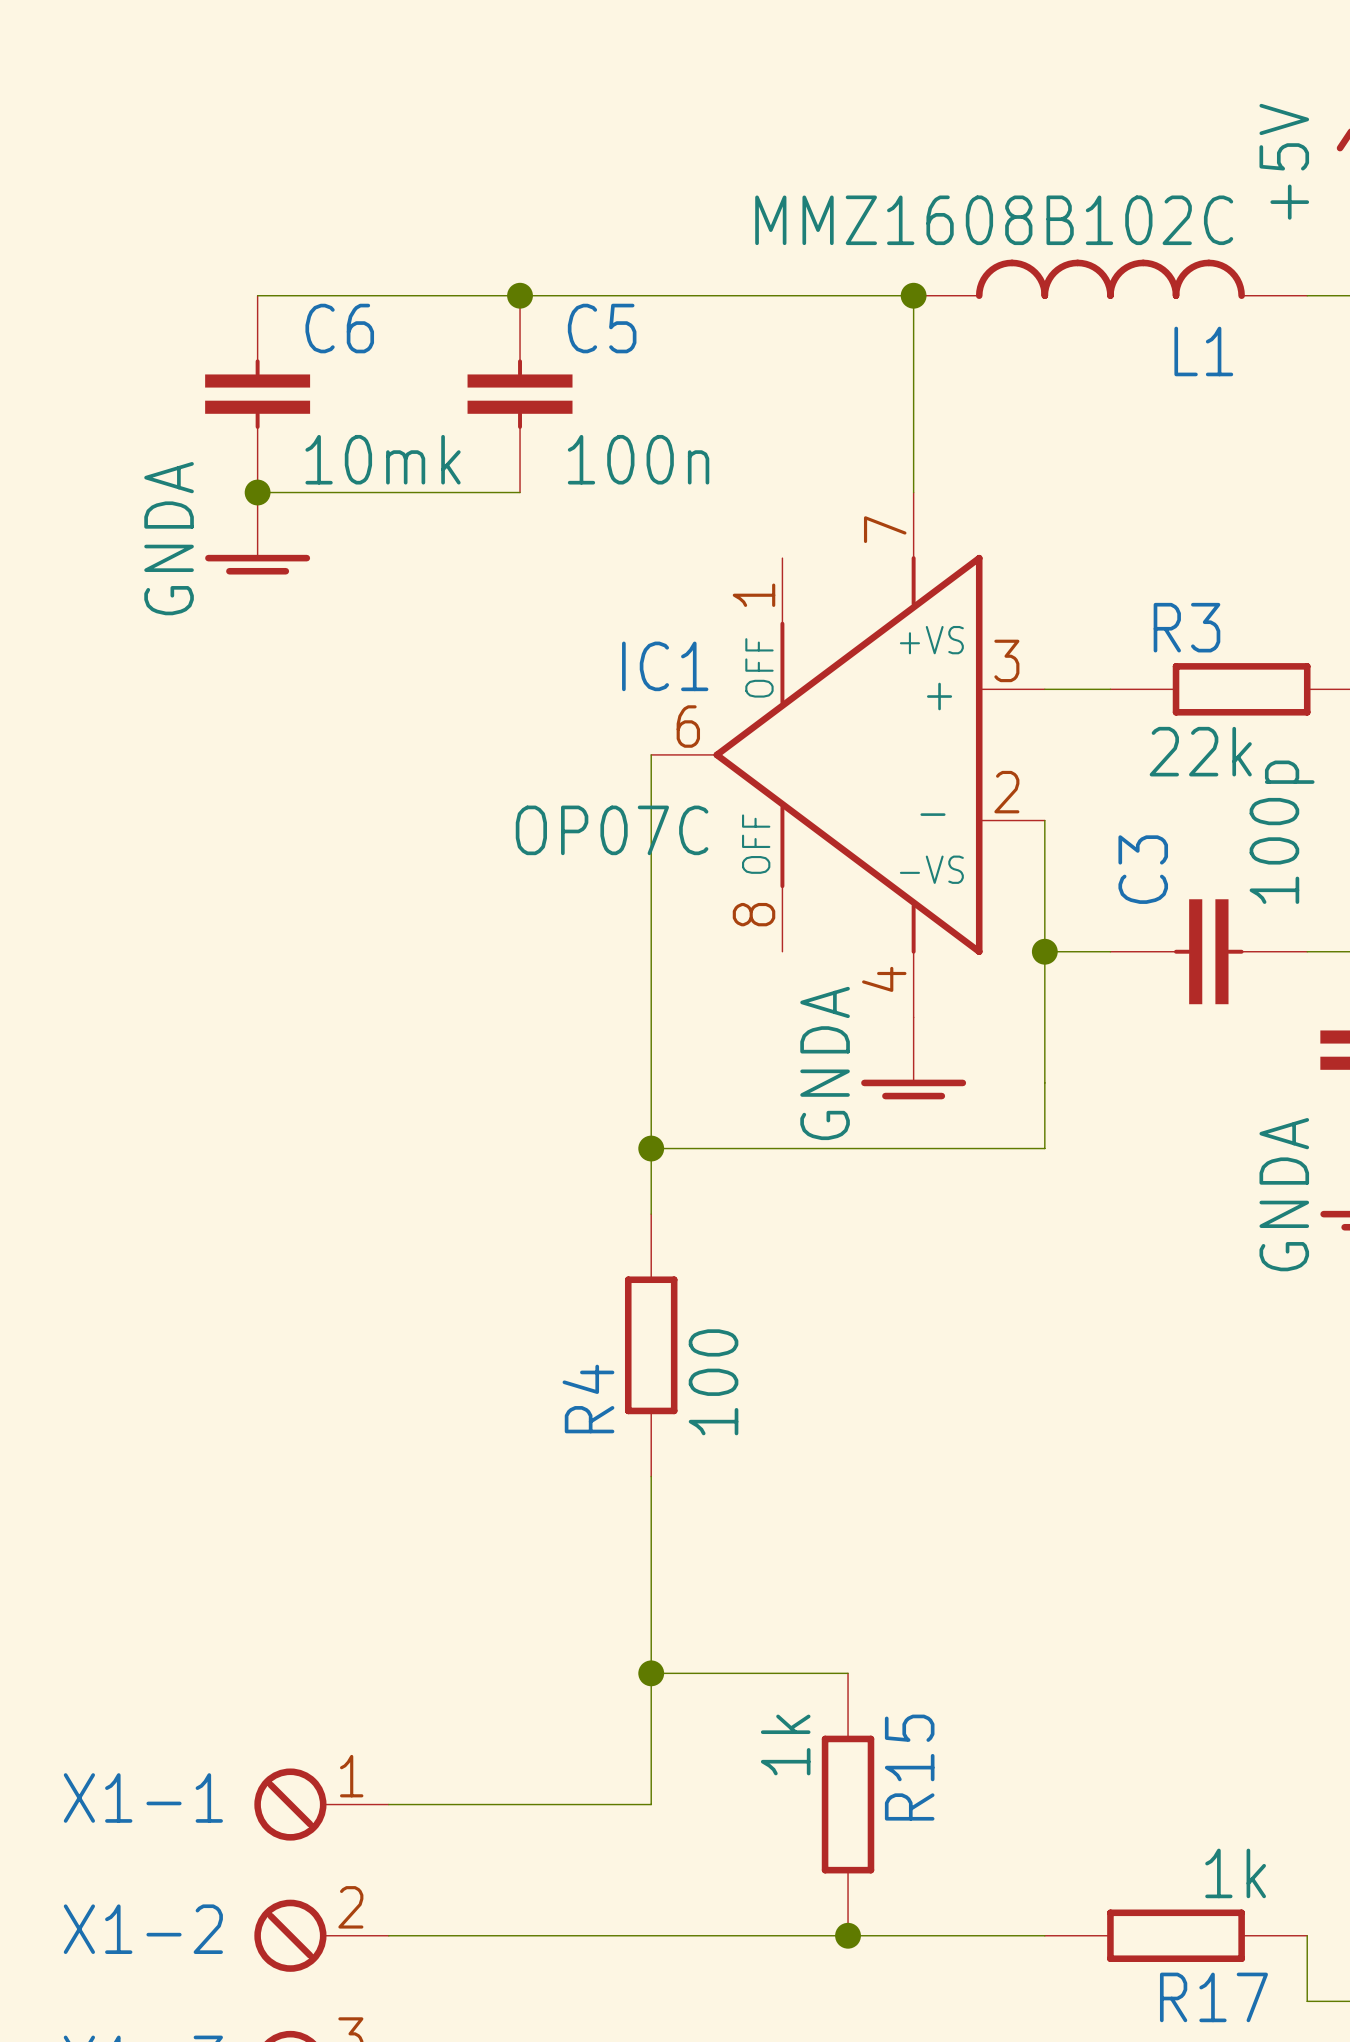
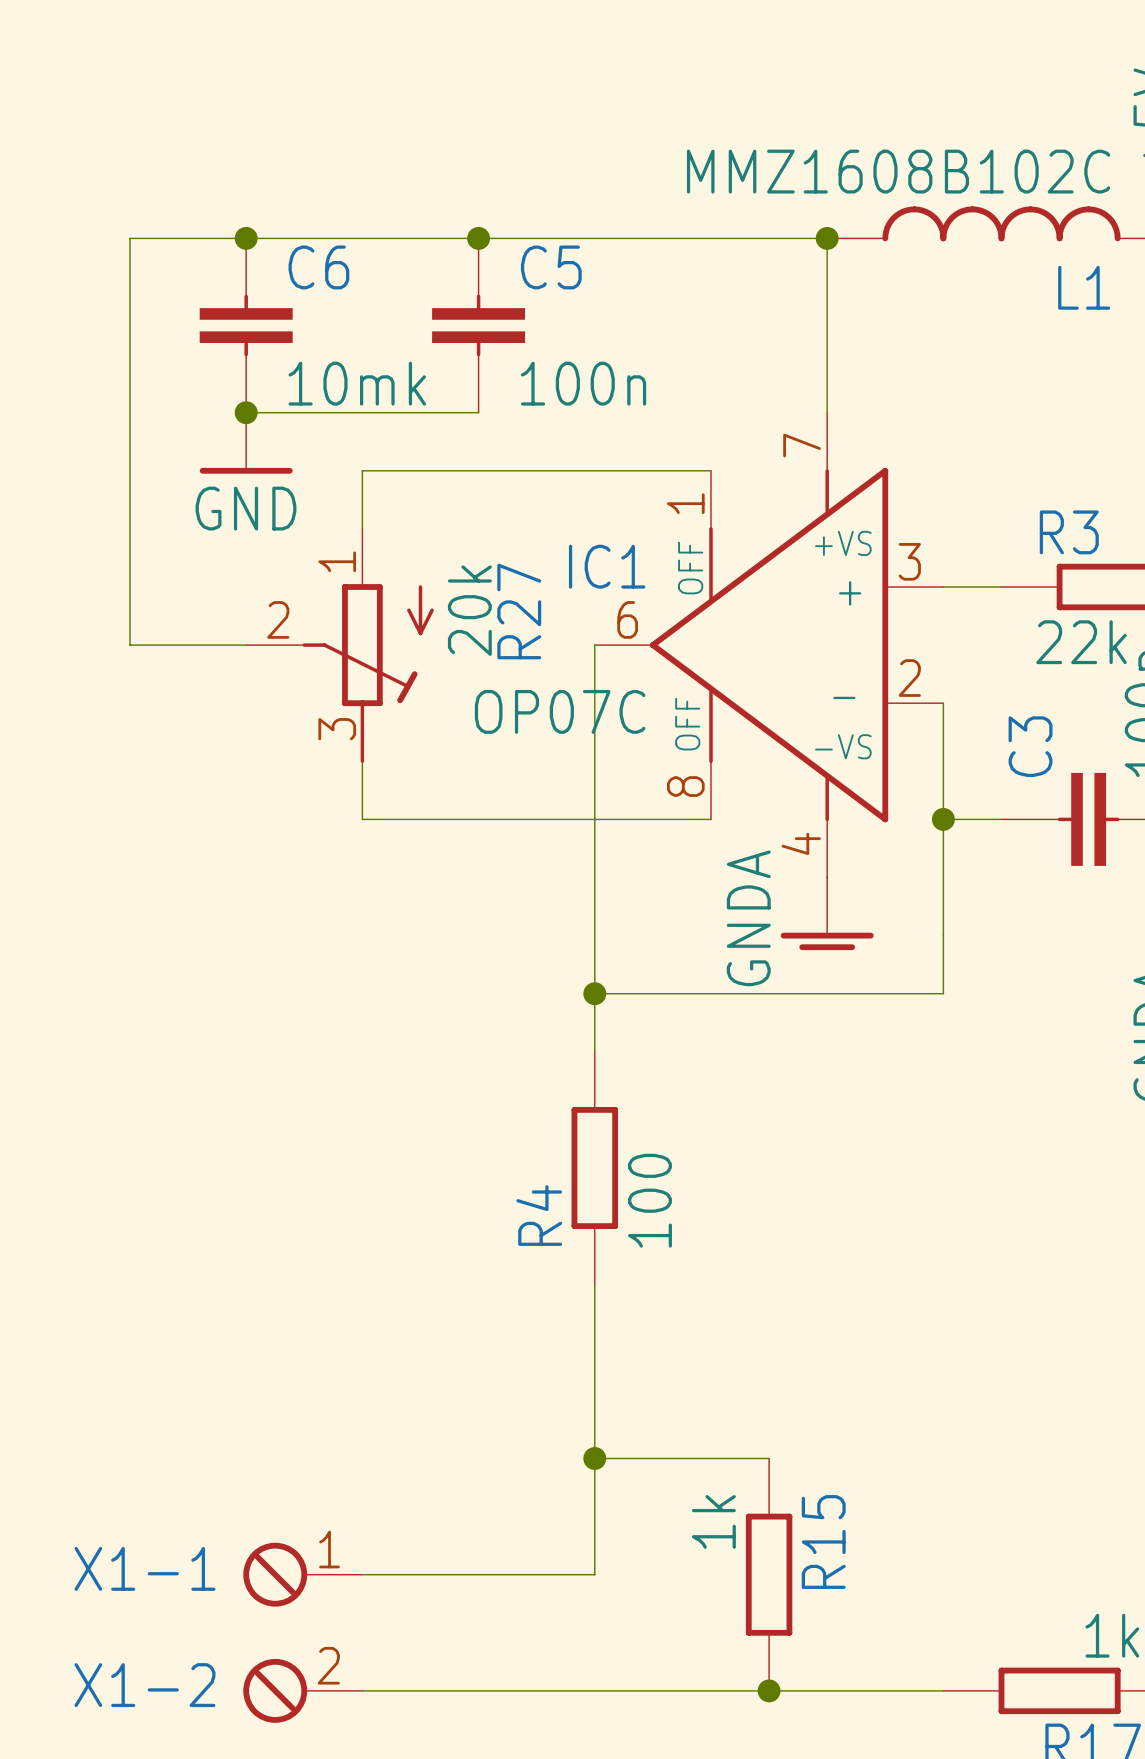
wire: none -> (246, 238) (129, 238) (129, 645) (246, 645)
junction: none -> (246, 238)
power symbol: GNDA (257, 533) -> GND (246, 443)
wire: none -> (710, 470) (362, 470) (362, 528)
R27: none -> 20k (340, 645)
wire: none -> (362, 761) (362, 819) (710, 819)

